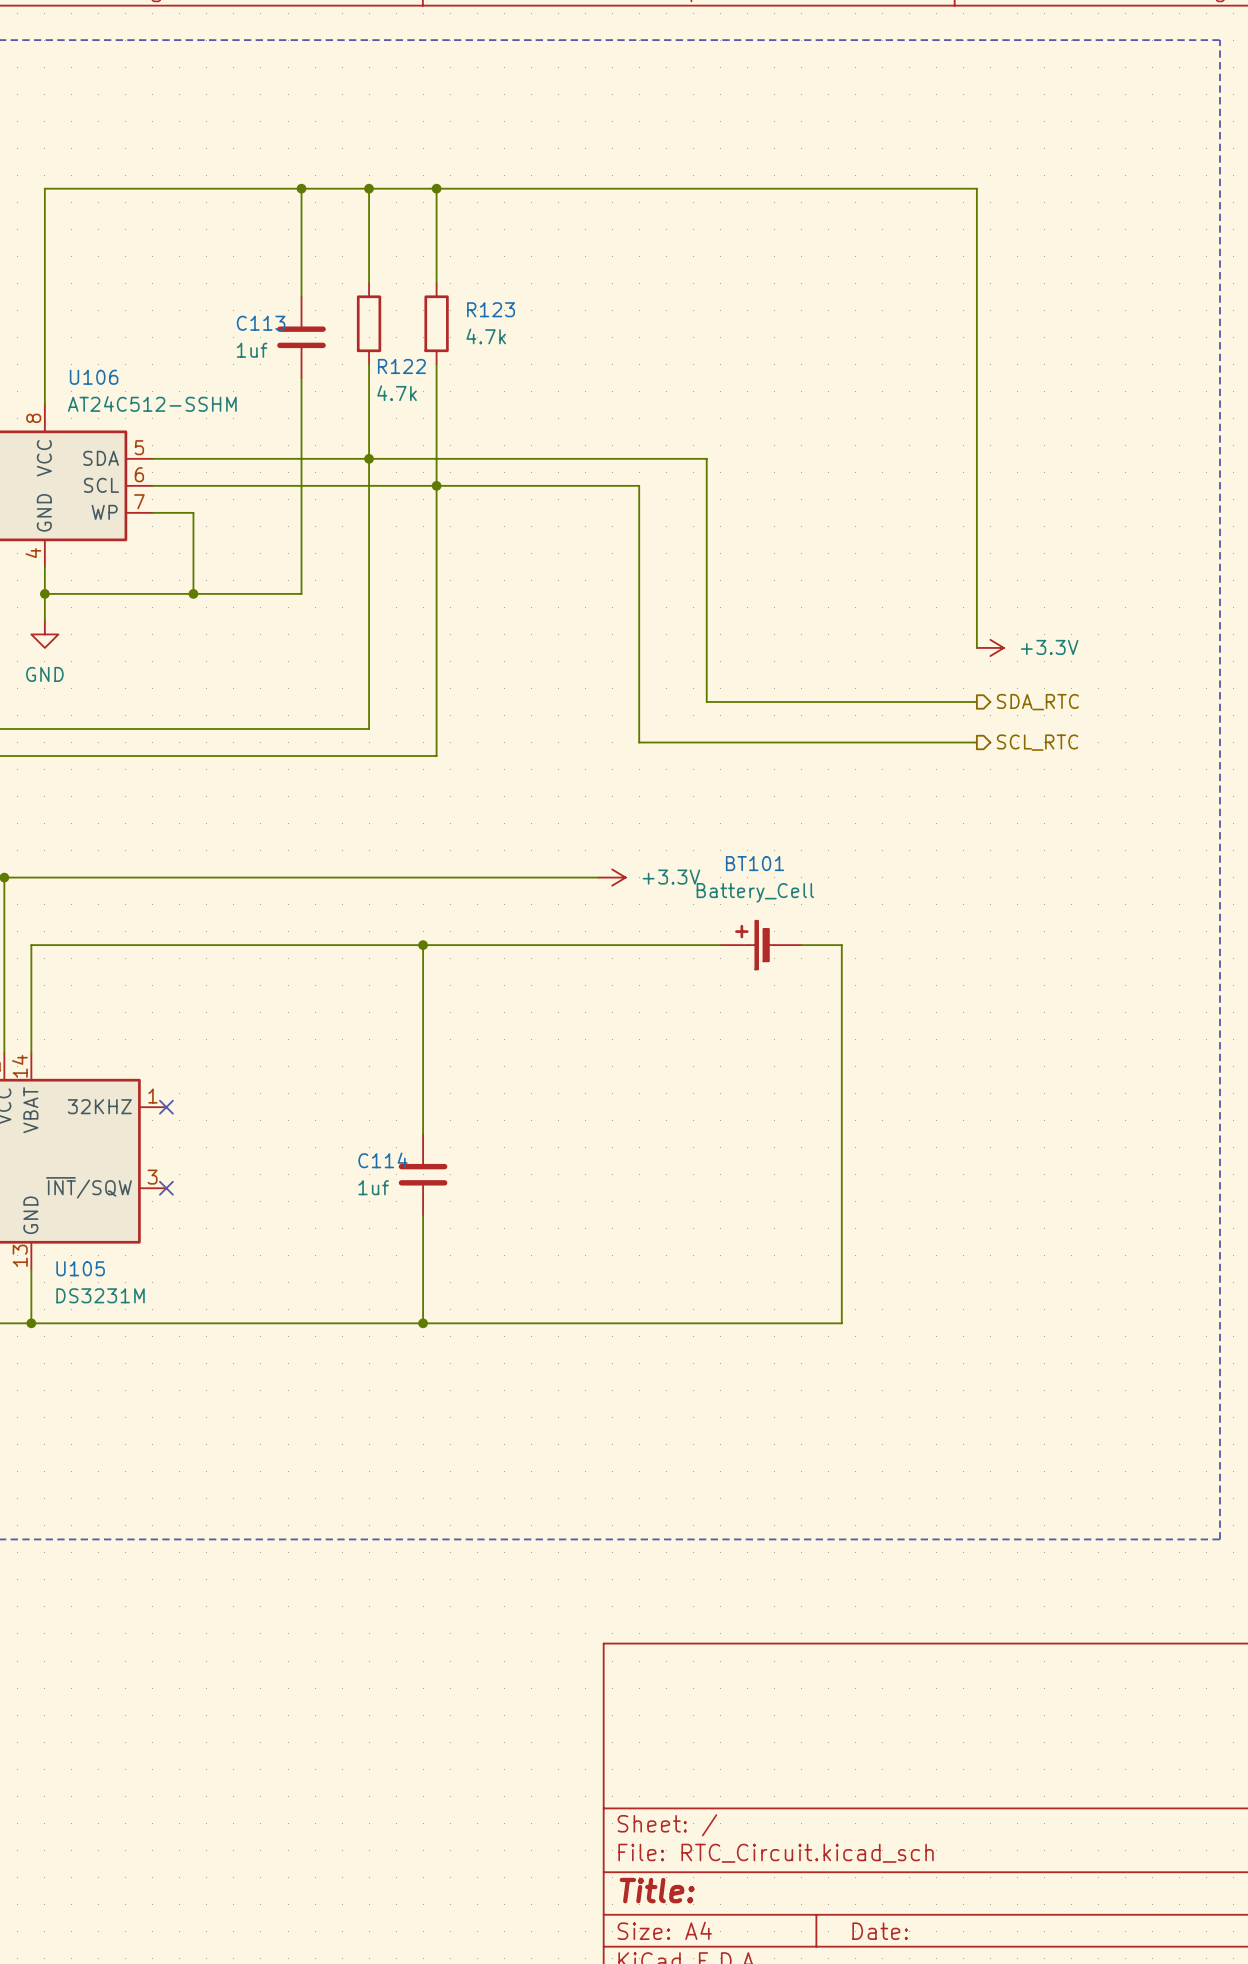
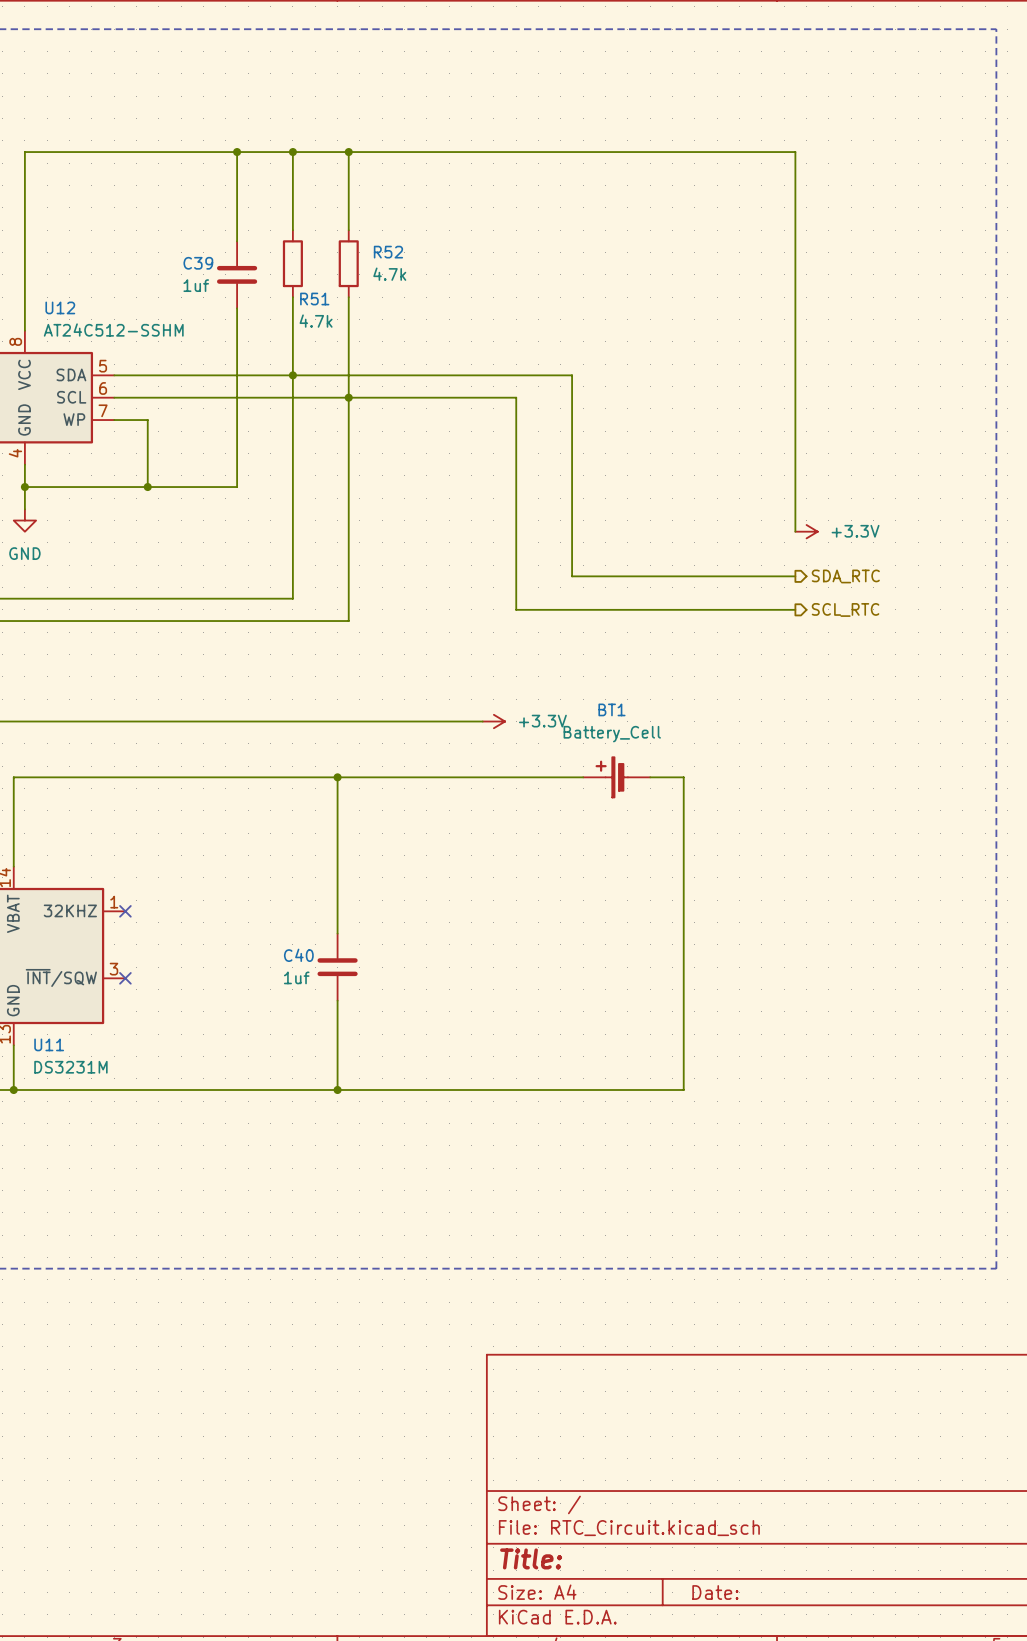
R123 name: R123 (491, 309) -> R52 (388, 252)
C113 name: C113 (261, 323) -> C39 (198, 263)
R122 name: R122 (401, 366) -> R51 (314, 299)
U106 name: U106 (94, 377) -> U12 (60, 307)
BT101 name: BT101 (755, 863) -> BT1 (611, 709)
C114 name: C114 (382, 1160) -> C40 (298, 955)
U105 name: U105 (80, 1268) -> U11 (49, 1044)

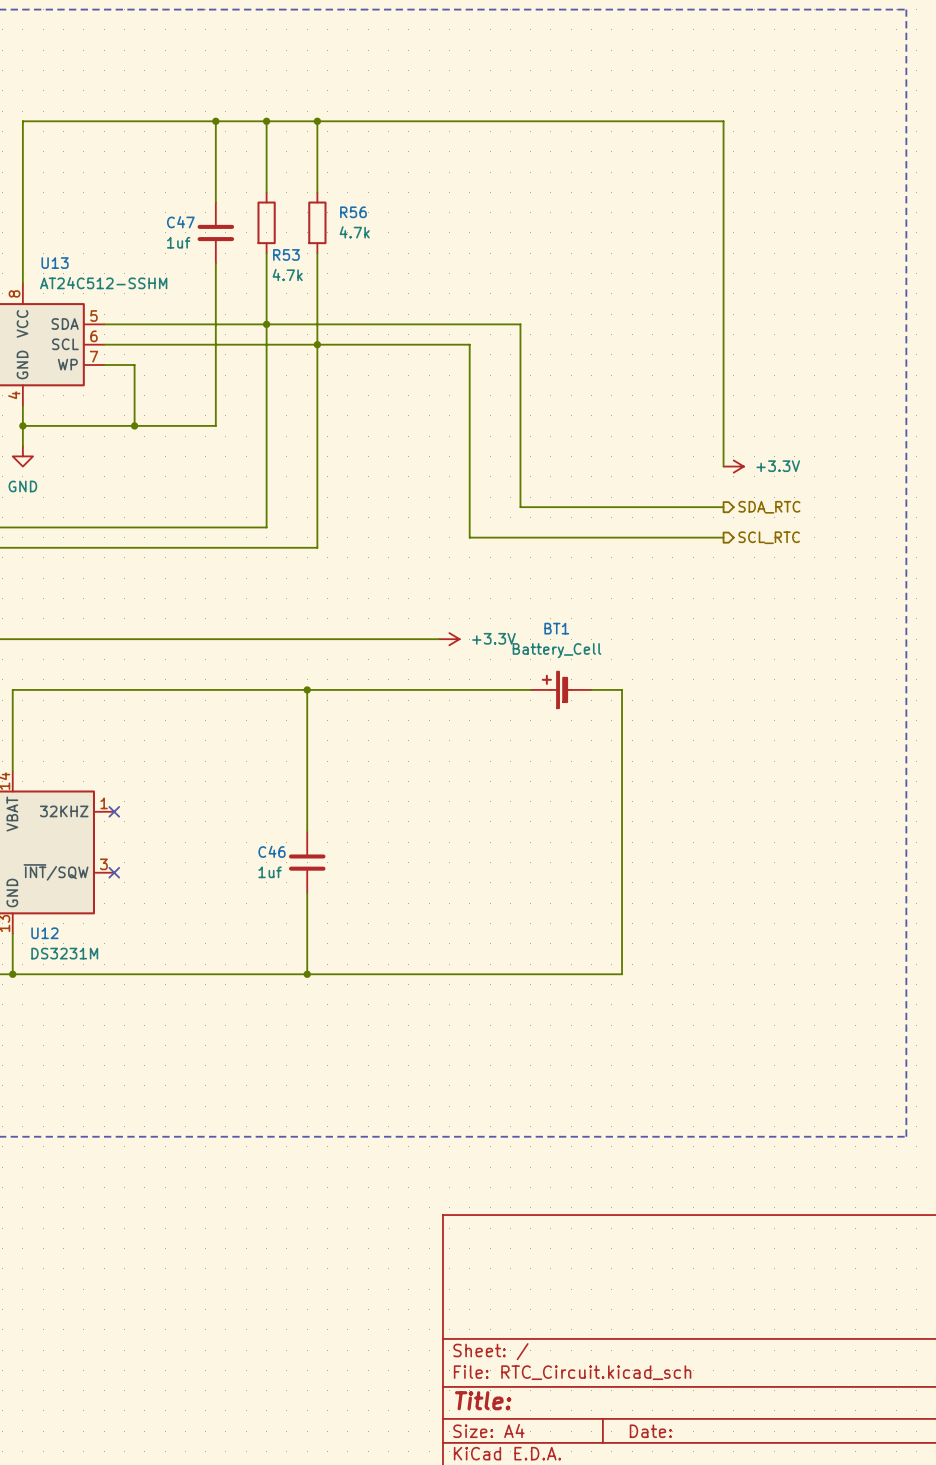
R52 name: R52 (388, 252) -> R56 (353, 212)
C39 name: C39 (198, 263) -> C47 (180, 222)
R51 name: R51 (314, 299) -> R53 (286, 254)
U12 name: U12 (60, 307) -> U13 (55, 263)
C40 name: C40 (298, 955) -> C46 (272, 851)
U11 name: U11 (49, 1044) -> U12 (44, 933)

